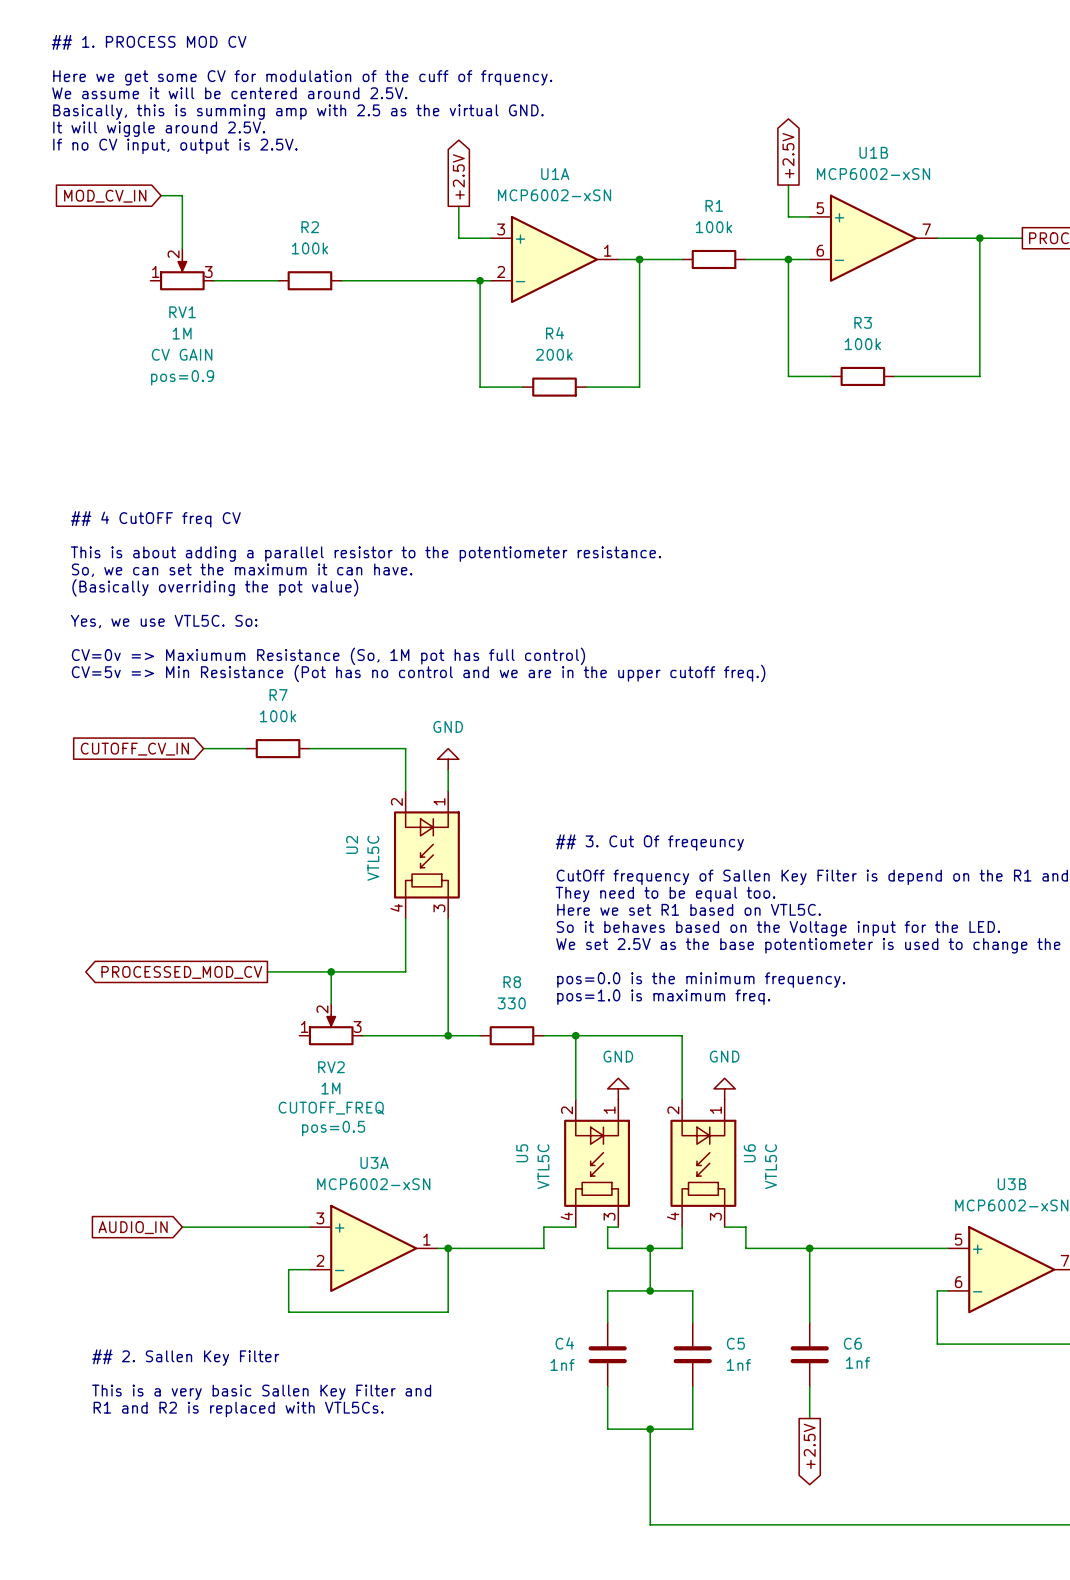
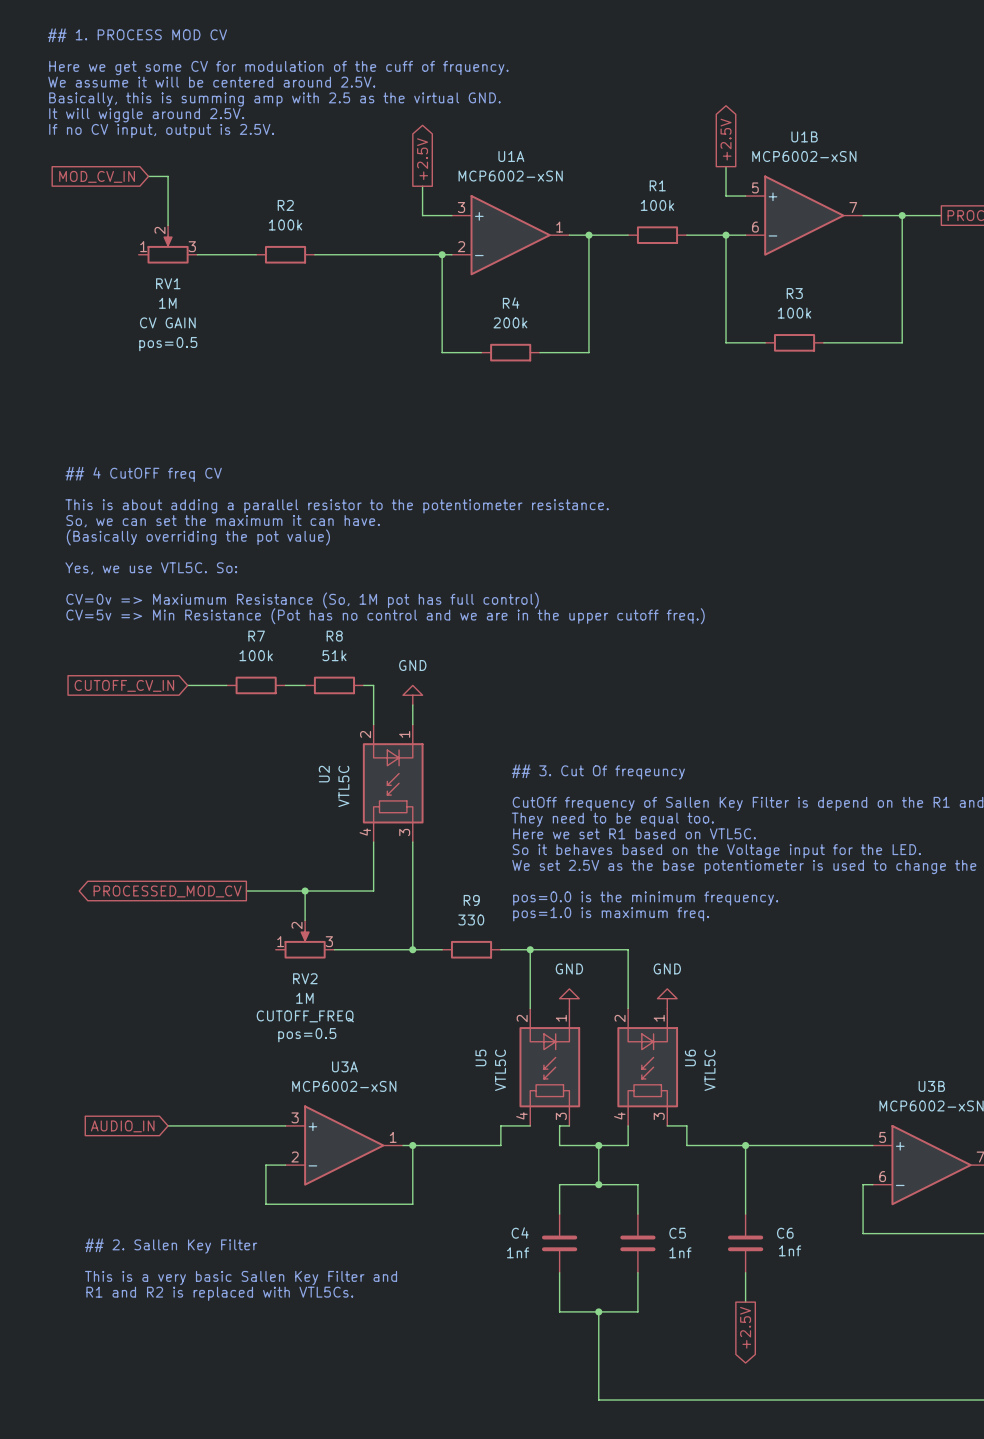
RV1 text: pos=0.9 (182, 377) -> pos=0.5 (168, 344)
wire: (331, 748) (395, 748) -> none
R8: none -> 51k (334, 685)
R8 name: R8 (512, 982) -> R9 (471, 900)

